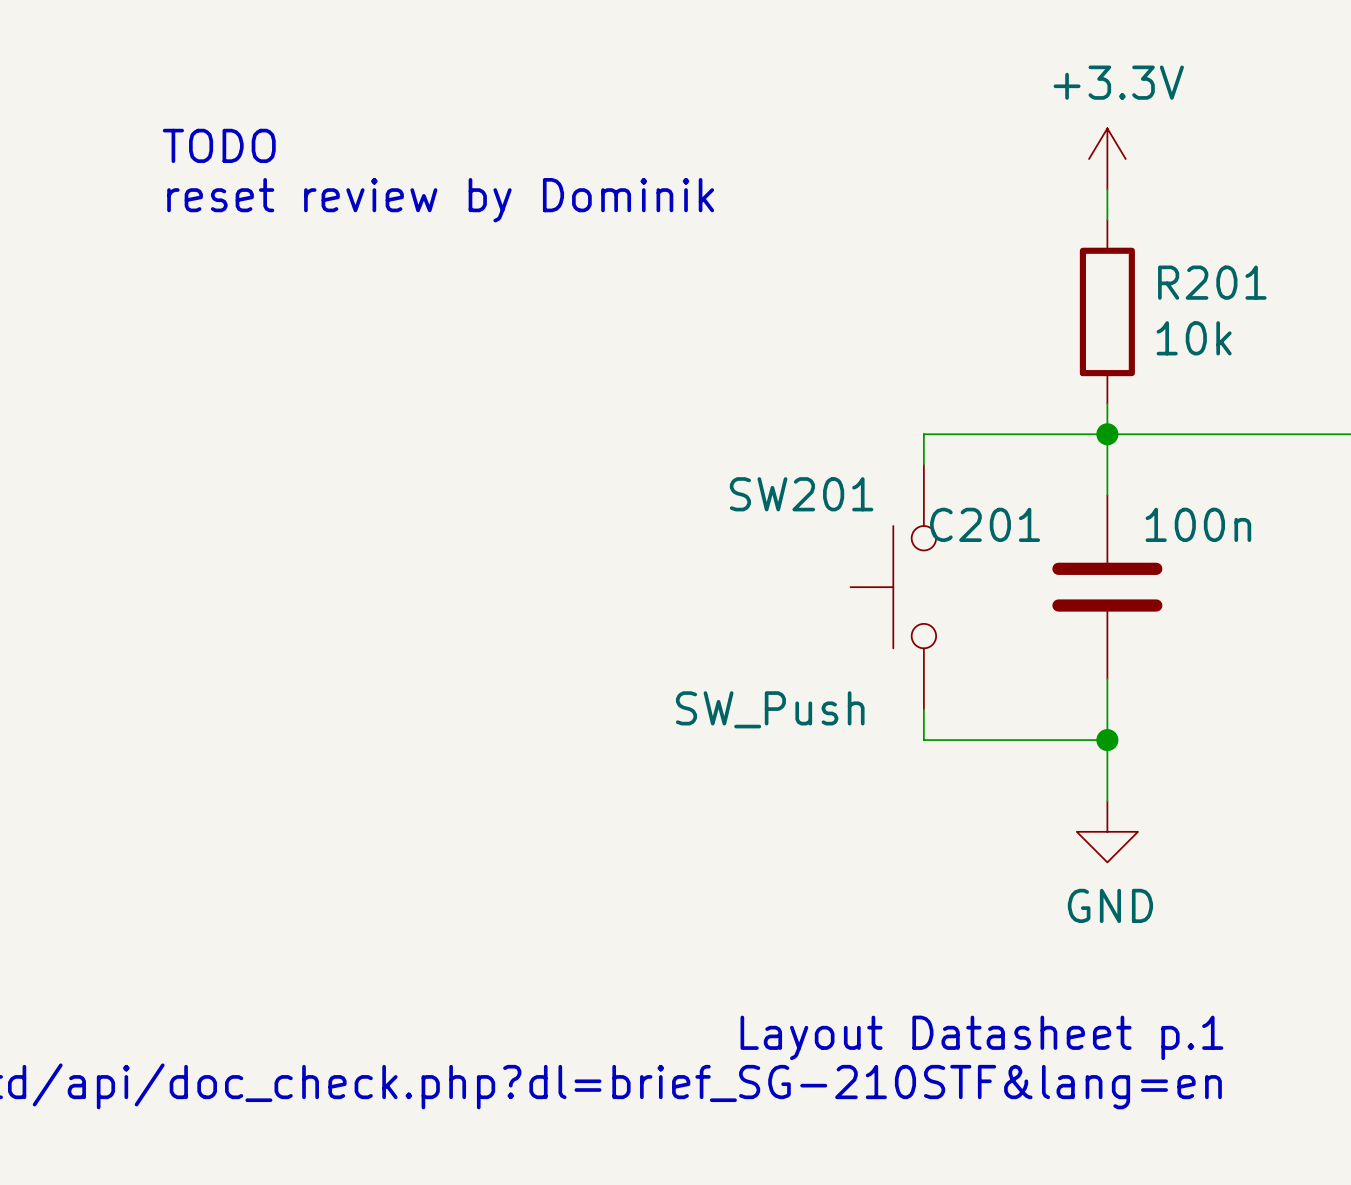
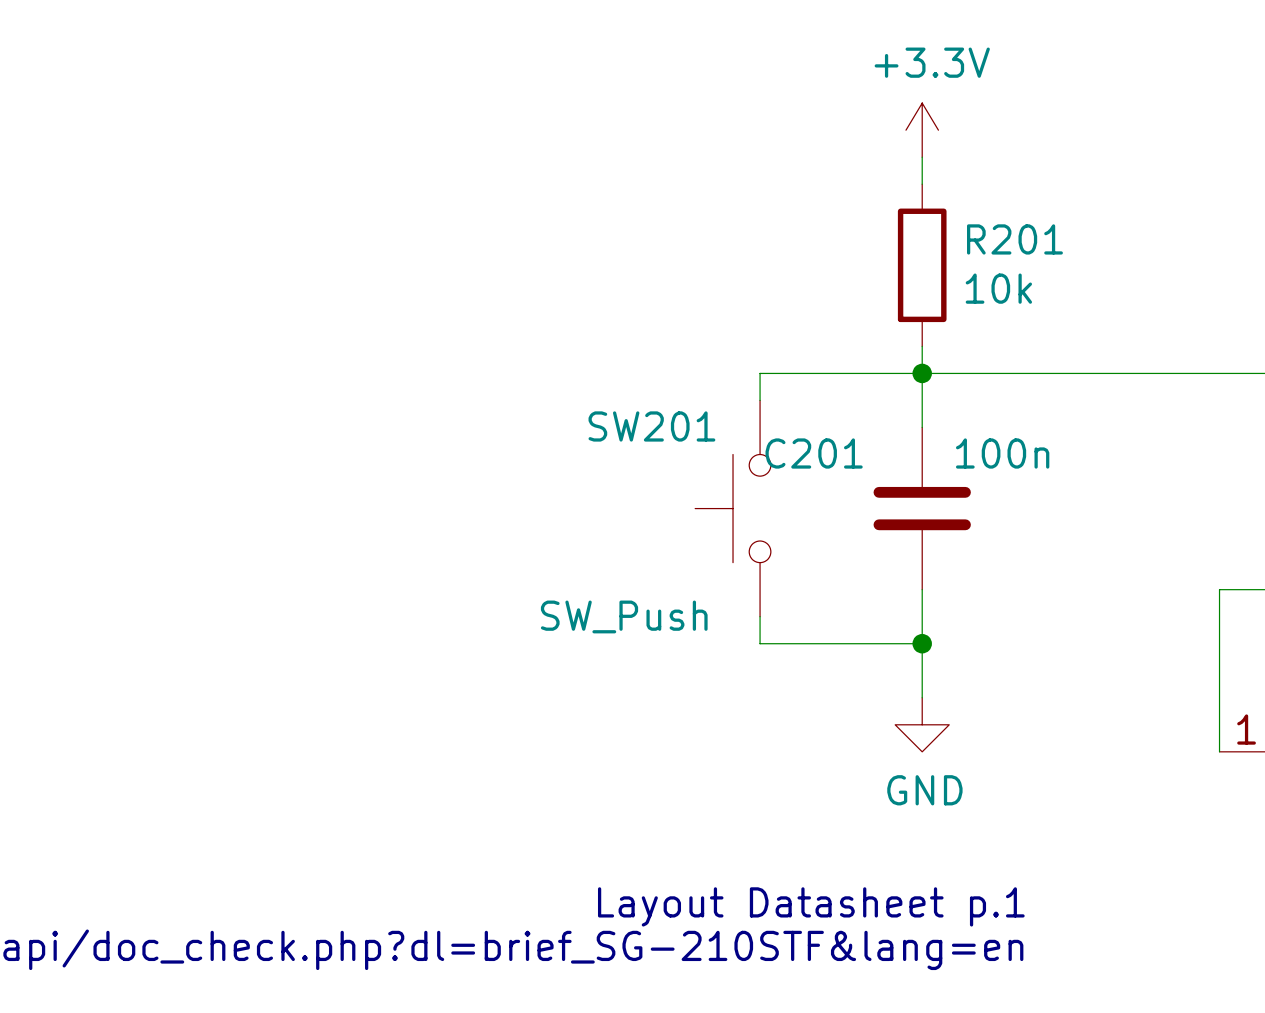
text: TODO (219, 145) -> none
text: reset review by Dominik (440, 200) -> none

